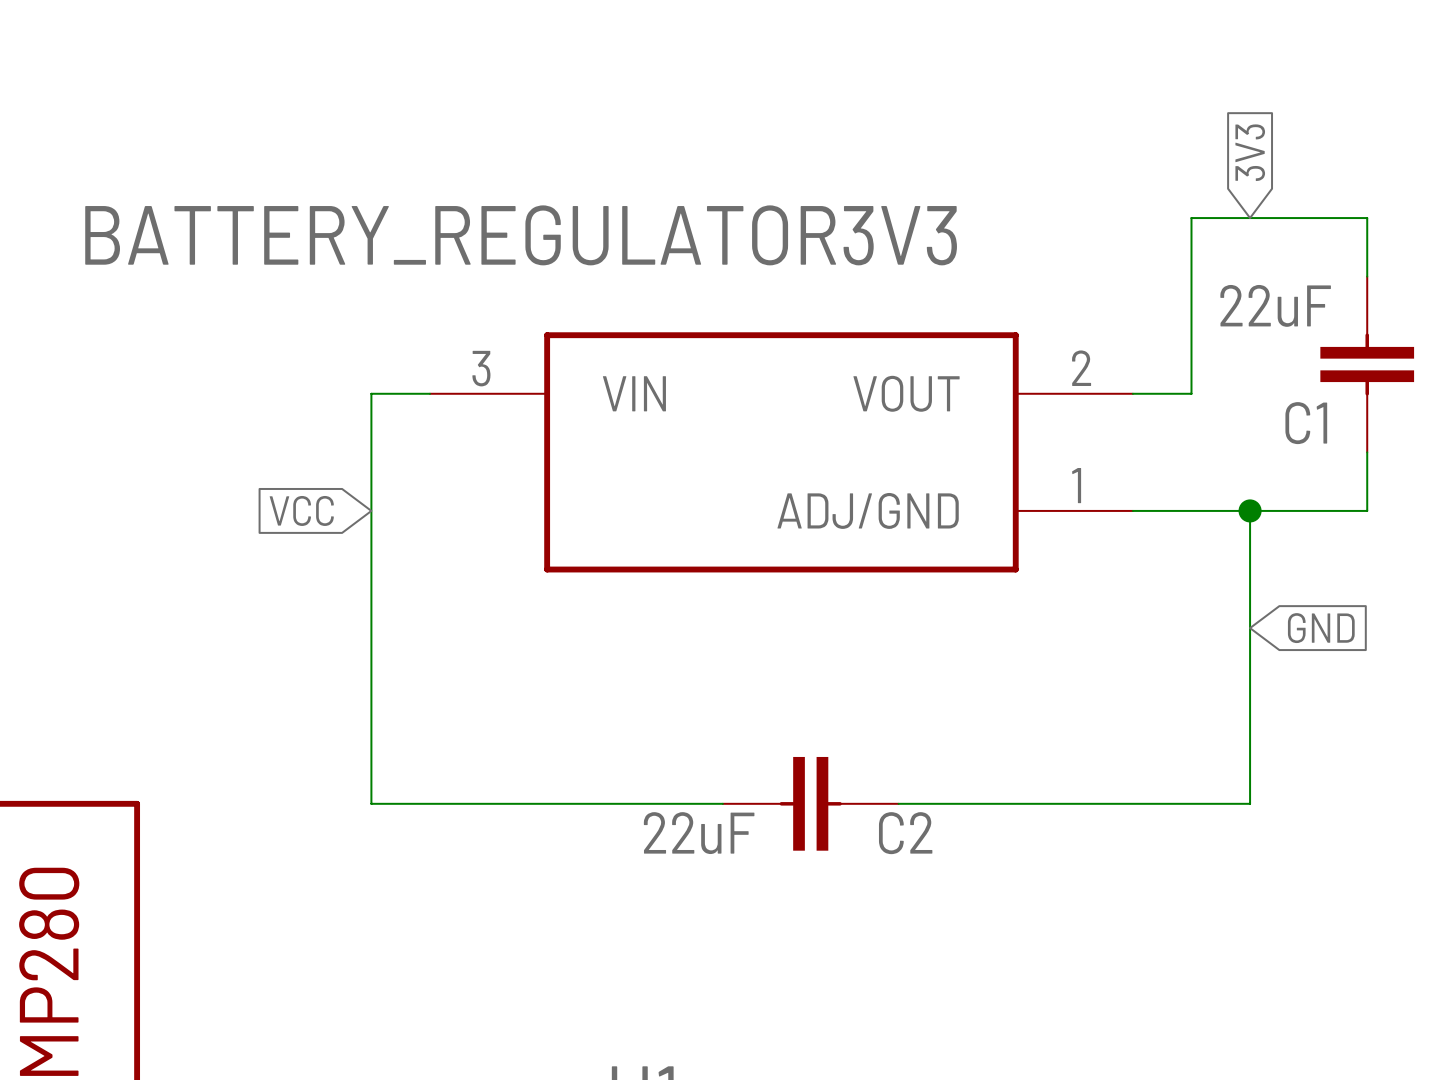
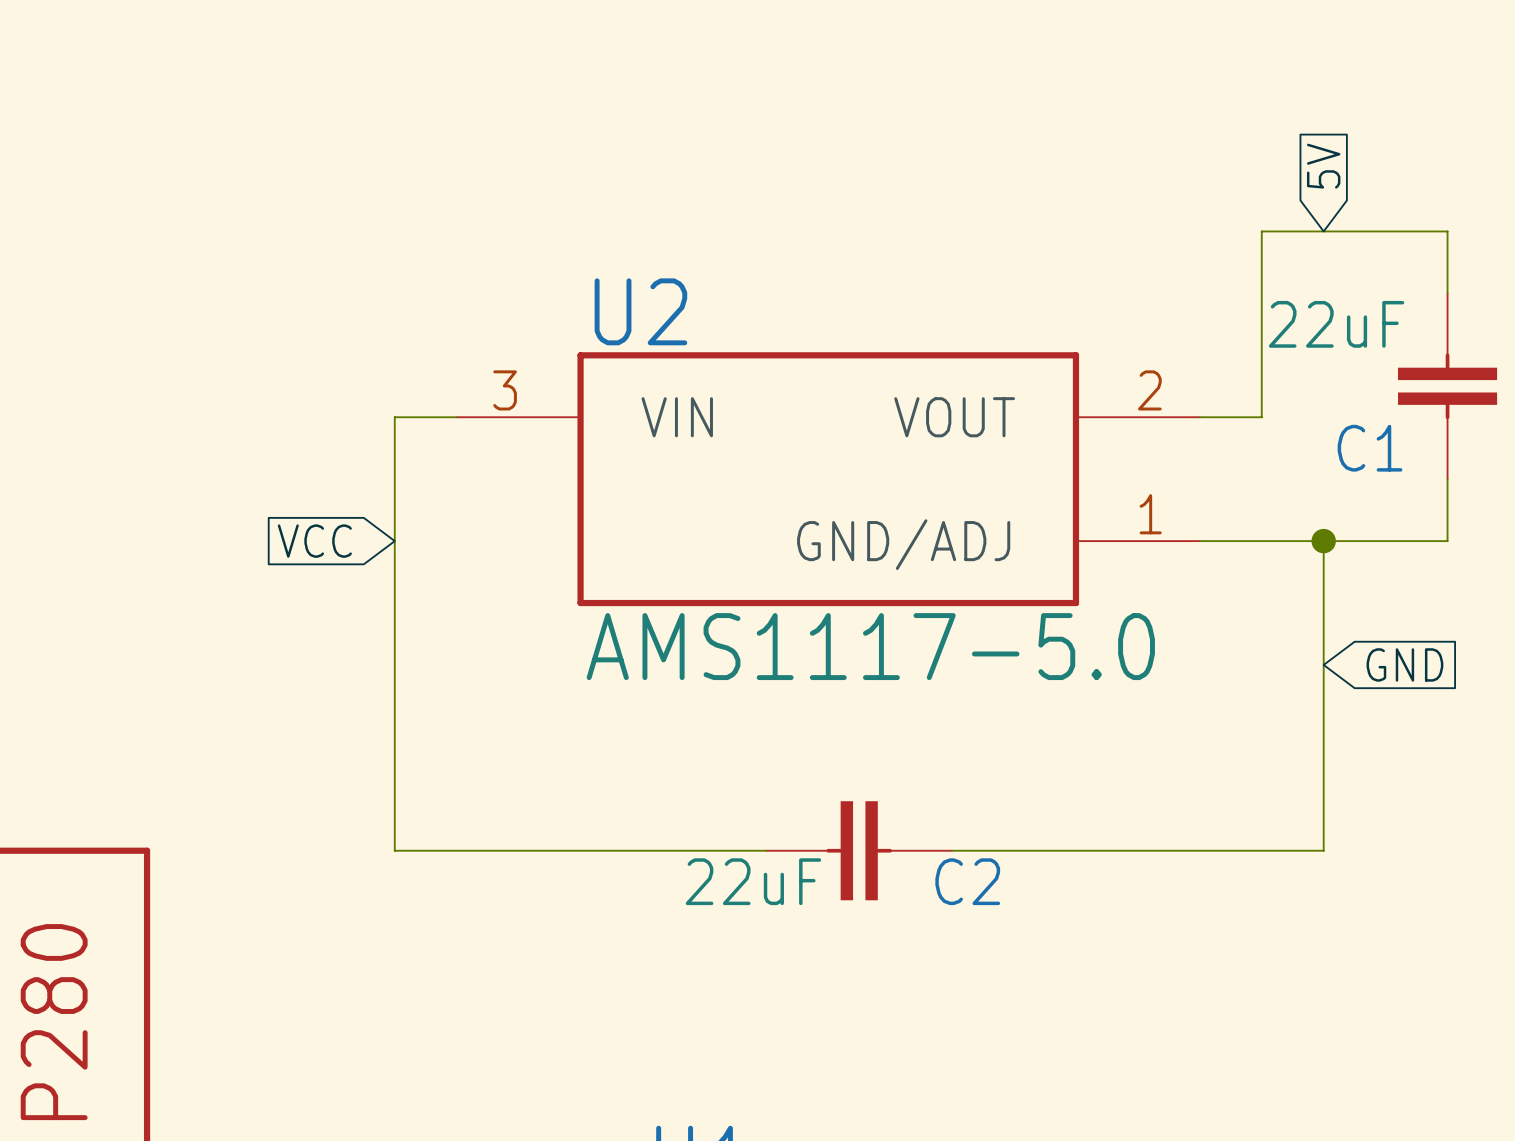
global label: 3V3 (1250, 152) -> 5V (1323, 166)
BATTERY_REGULATOR3V3 name: BATTERY_REGULATOR3V3 (521, 235) -> U2 (640, 311)
BATTERY_REGULATOR3V3 pin name: ADJ/GND (868, 510) -> GND/ADJ (903, 544)
BATTERY_REGULATOR3V3 value: none -> AMS1117-5.0 (870, 646)

